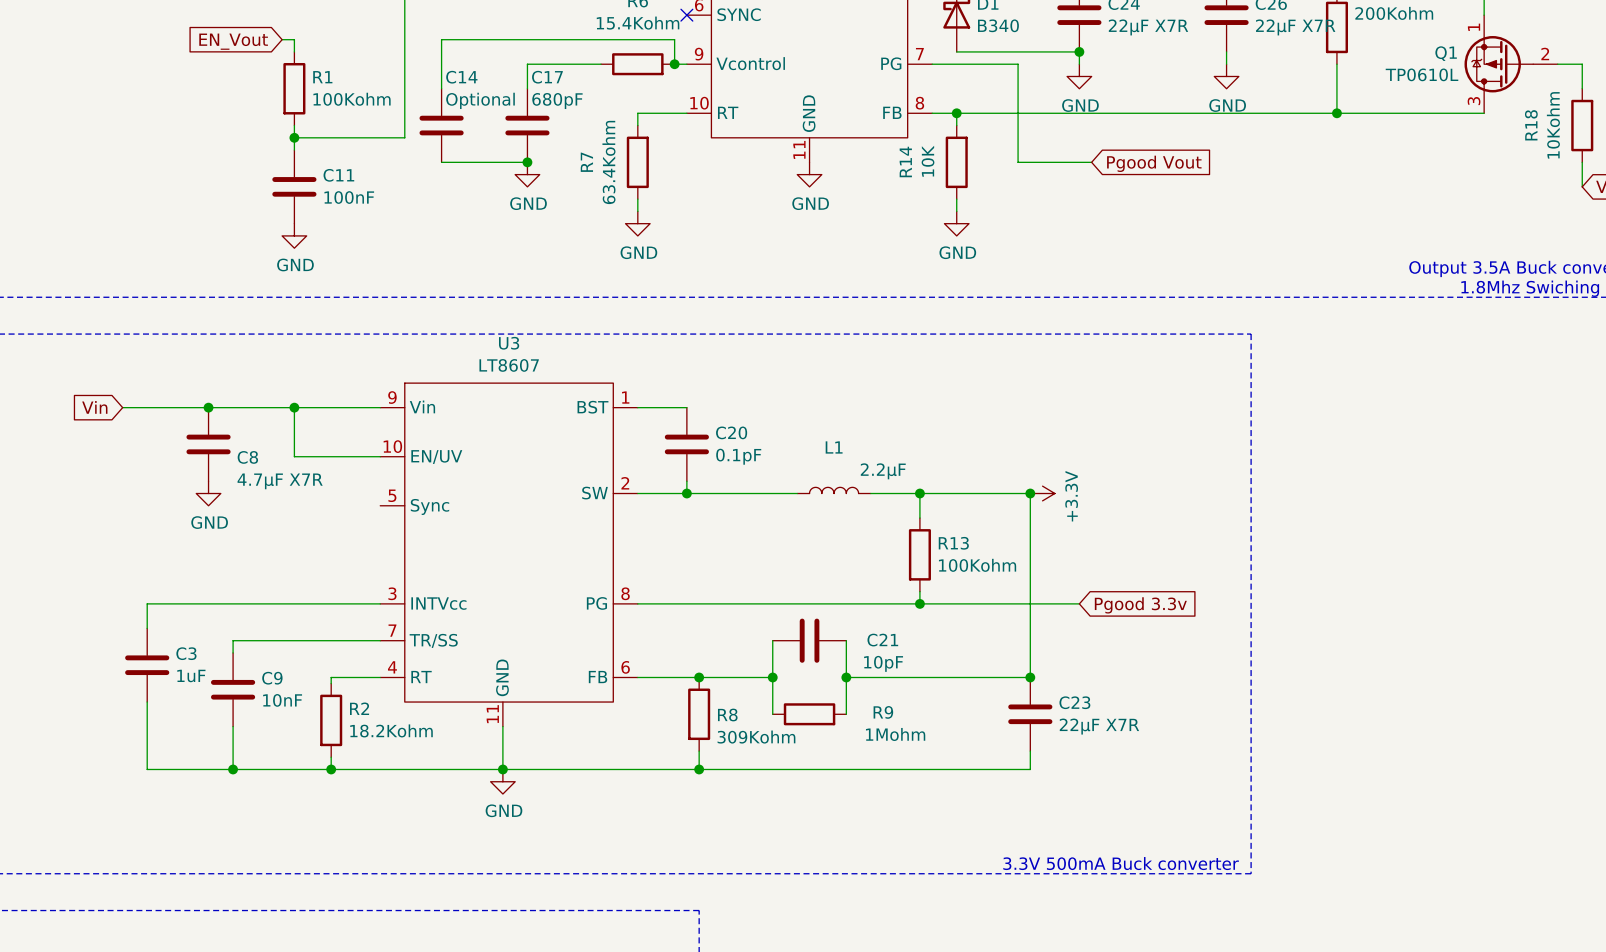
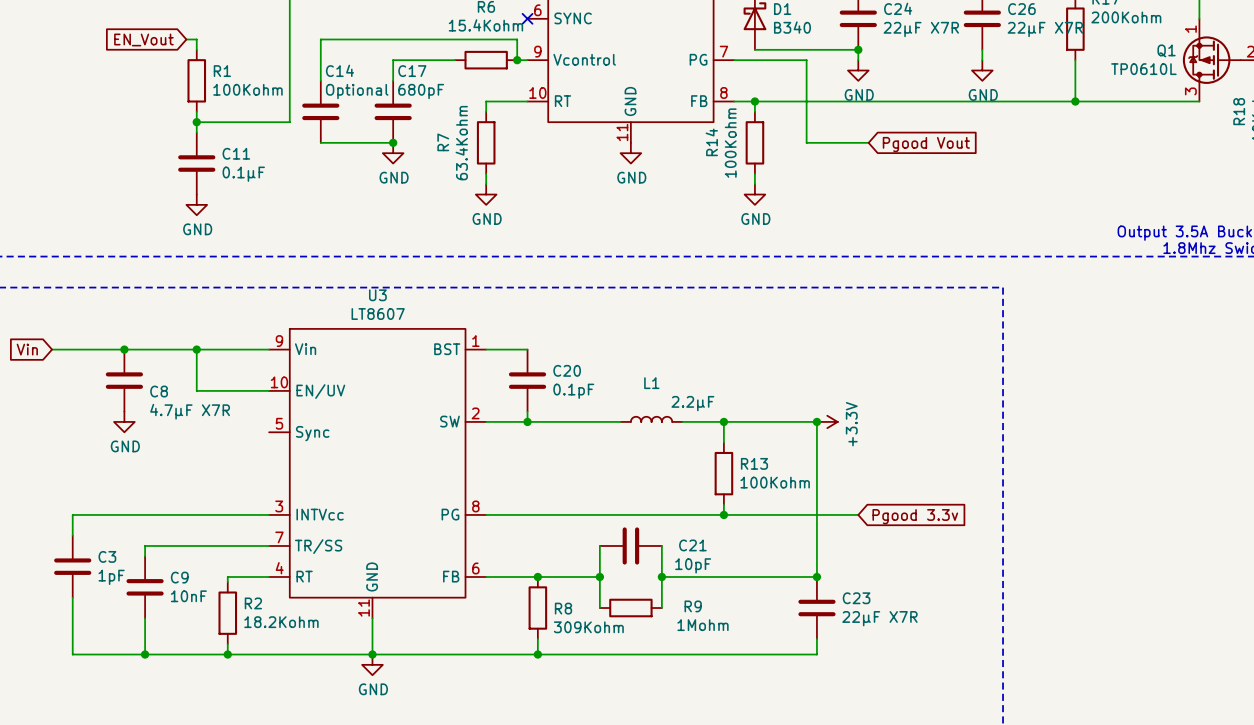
R14 value: 10K (928, 161) -> 100Kohm (730, 143)
C11 value: 100nF (349, 197) -> 0.1µF (243, 174)
C3 value: 1uF (191, 675) -> 1pF (111, 577)

